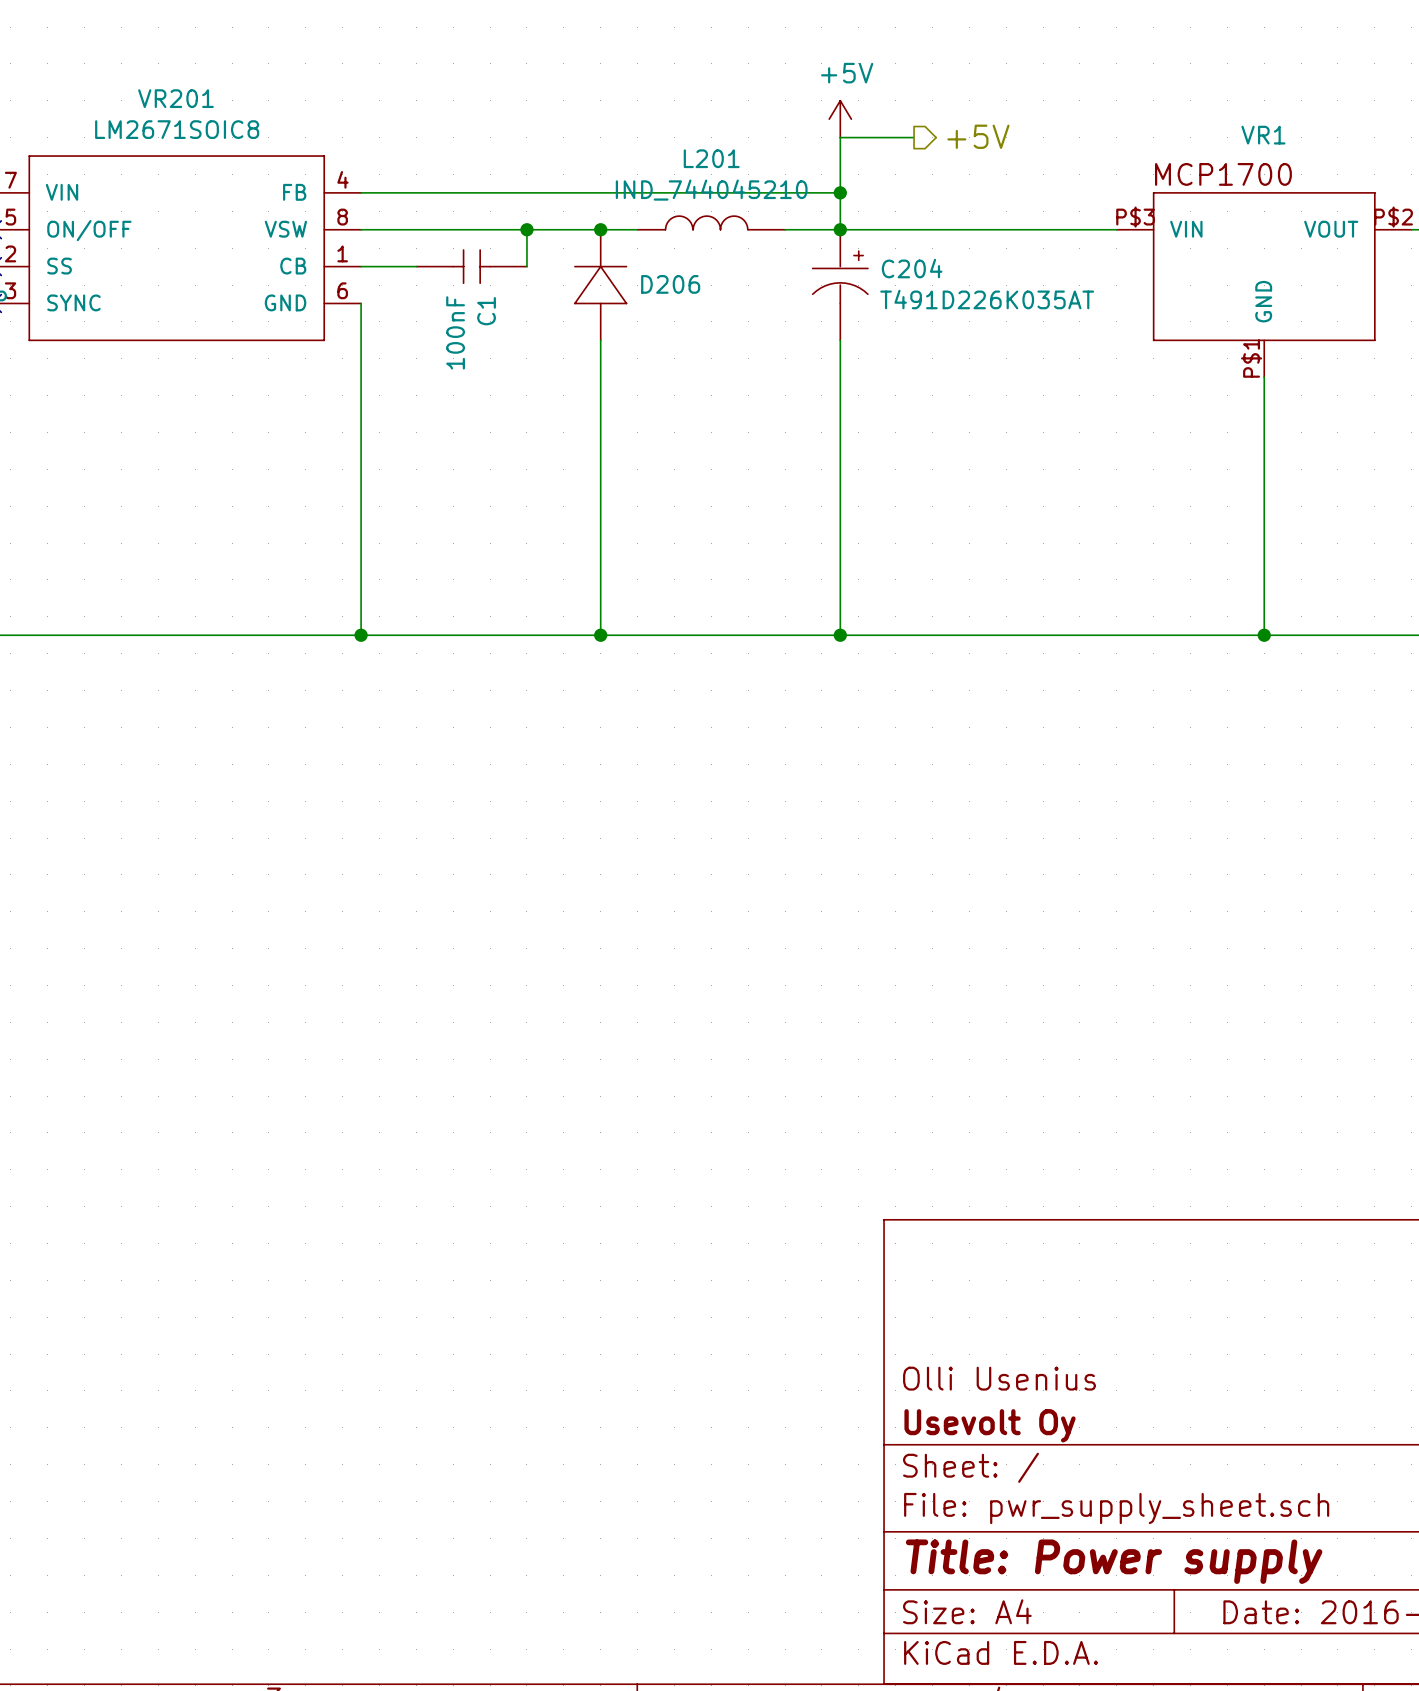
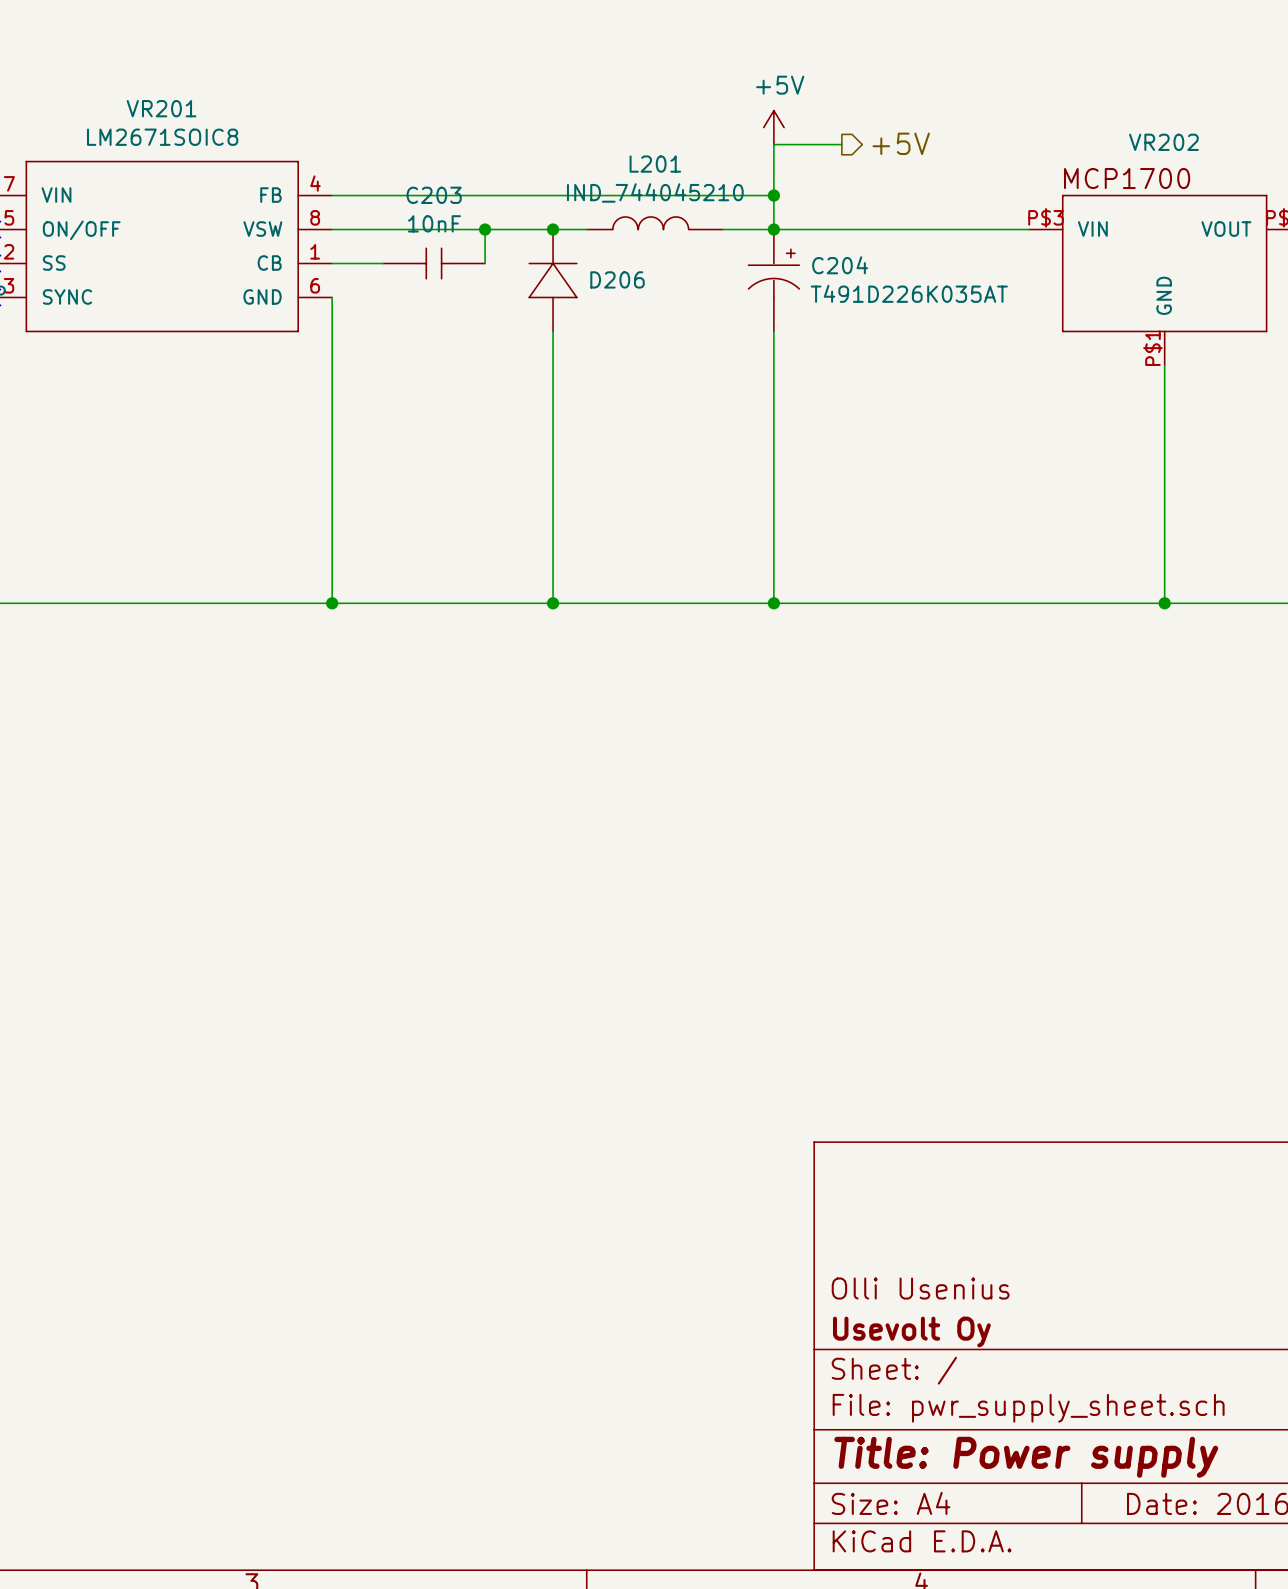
VR1 name: VR1 (1263, 135) -> VR202 (1163, 142)
C1 name: C1 (486, 311) -> C203 (434, 195)
C1 value: 100nF (455, 332) -> 10nF (434, 223)

